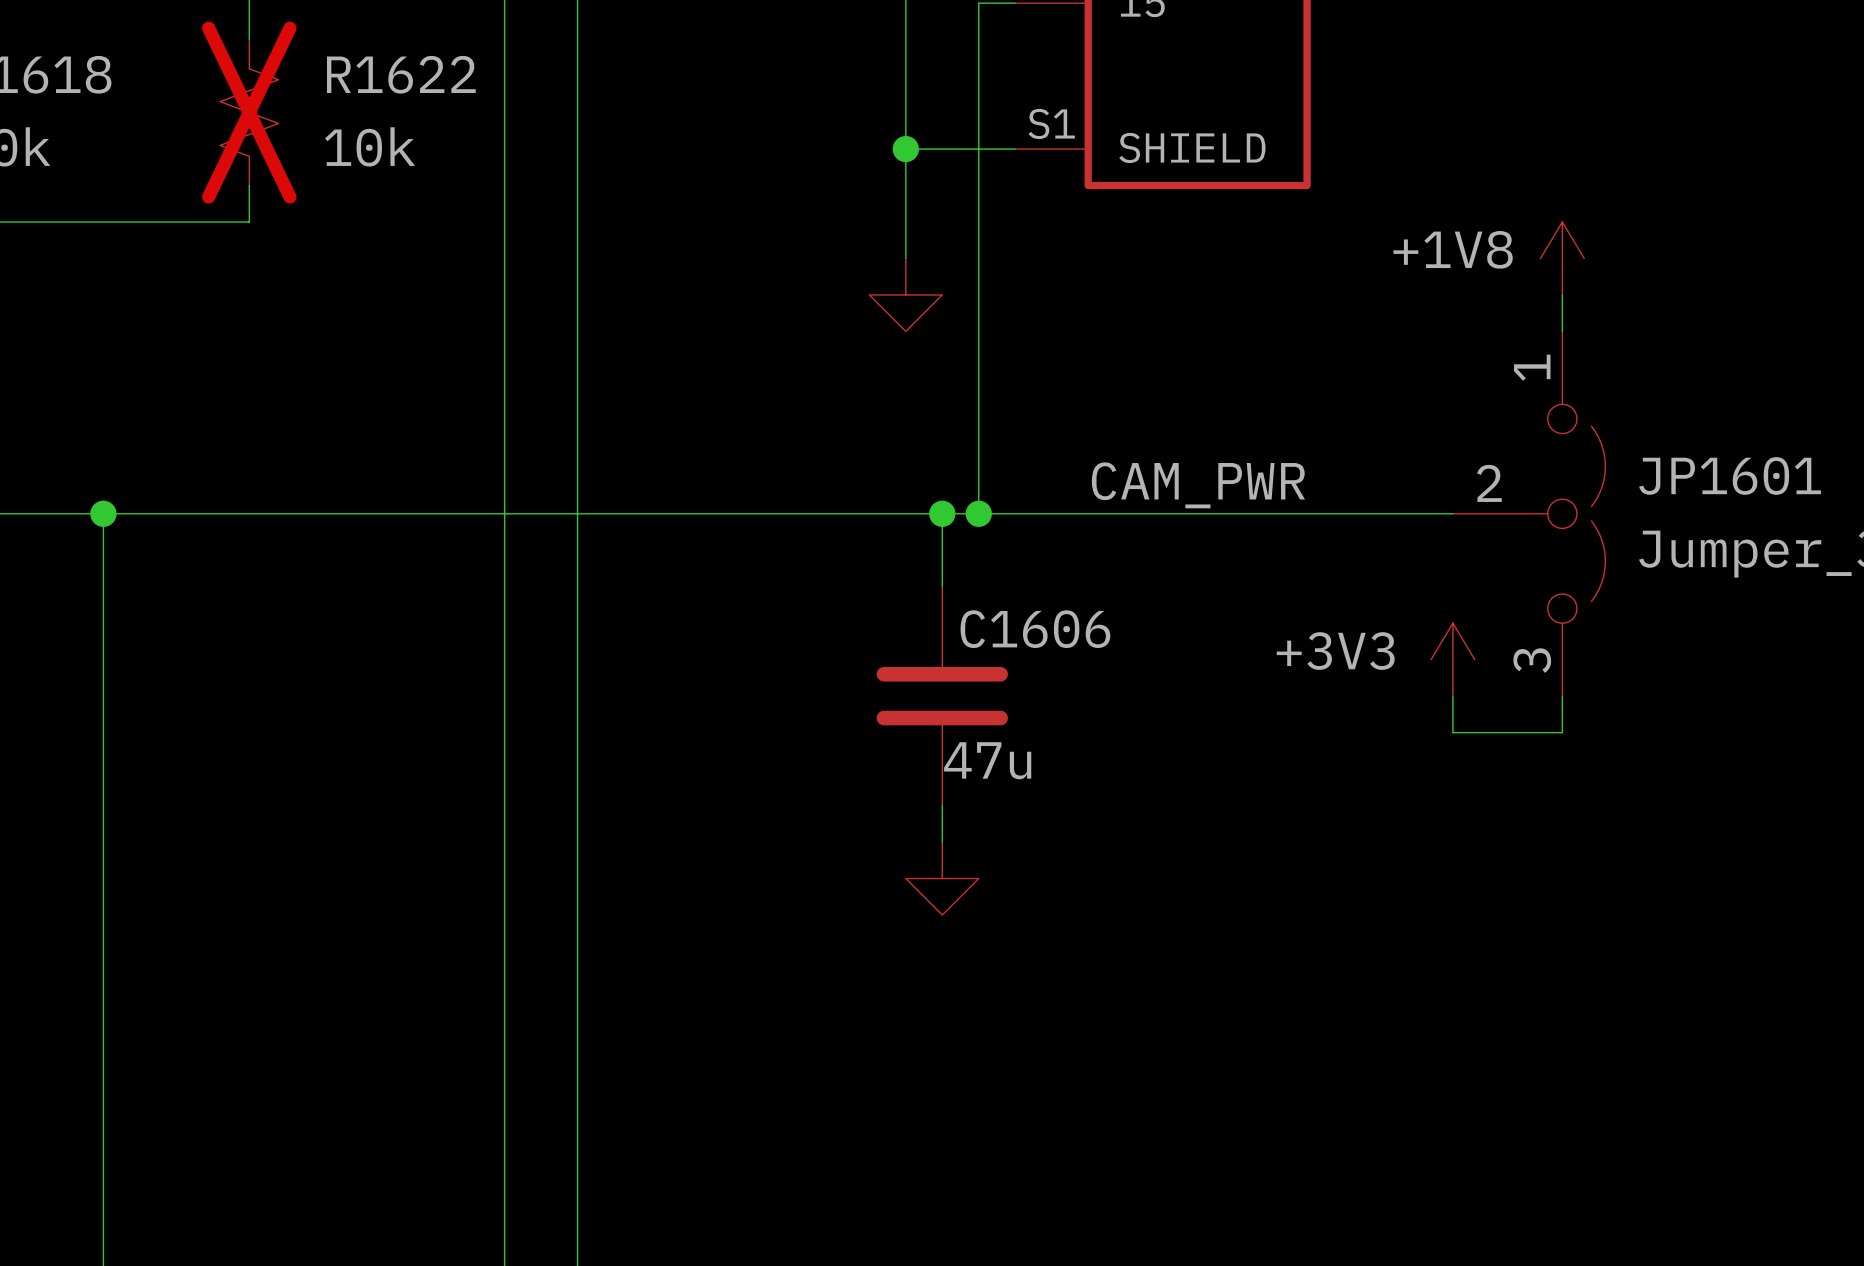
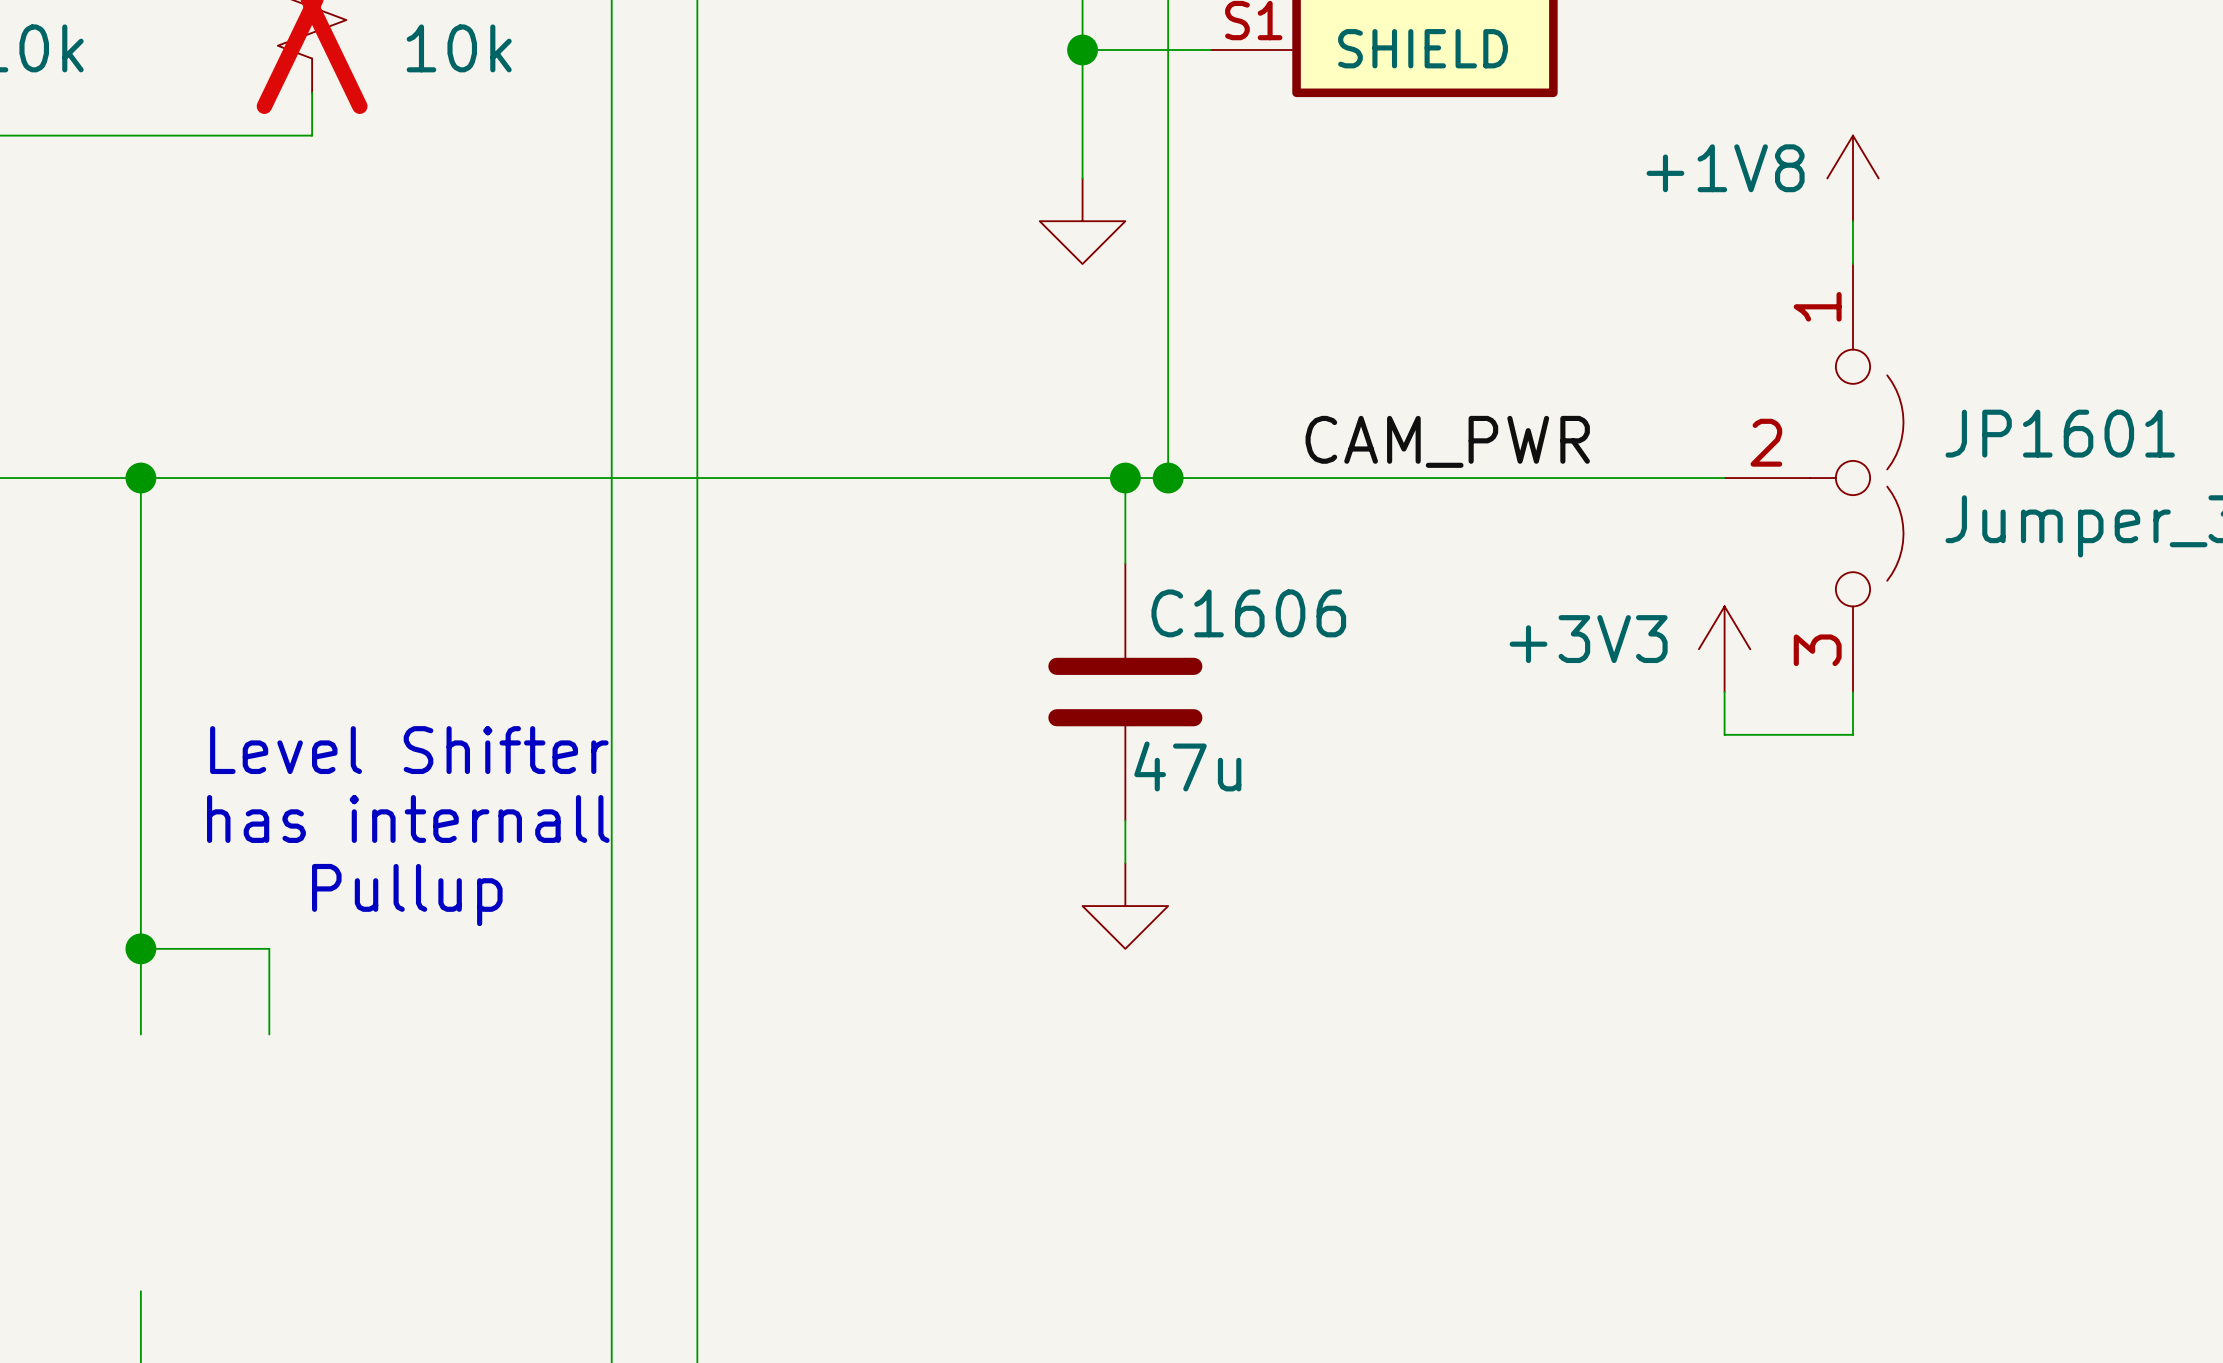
text: none -> Level Shifter (409, 750)
text: none -> has internall (408, 818)
text: none -> Pullup (407, 895)
wire: none -> (140, 948) (269, 948) (269, 1034)
junction: none -> (140, 948)
wire: (103, 987) (103, 1206) -> none

